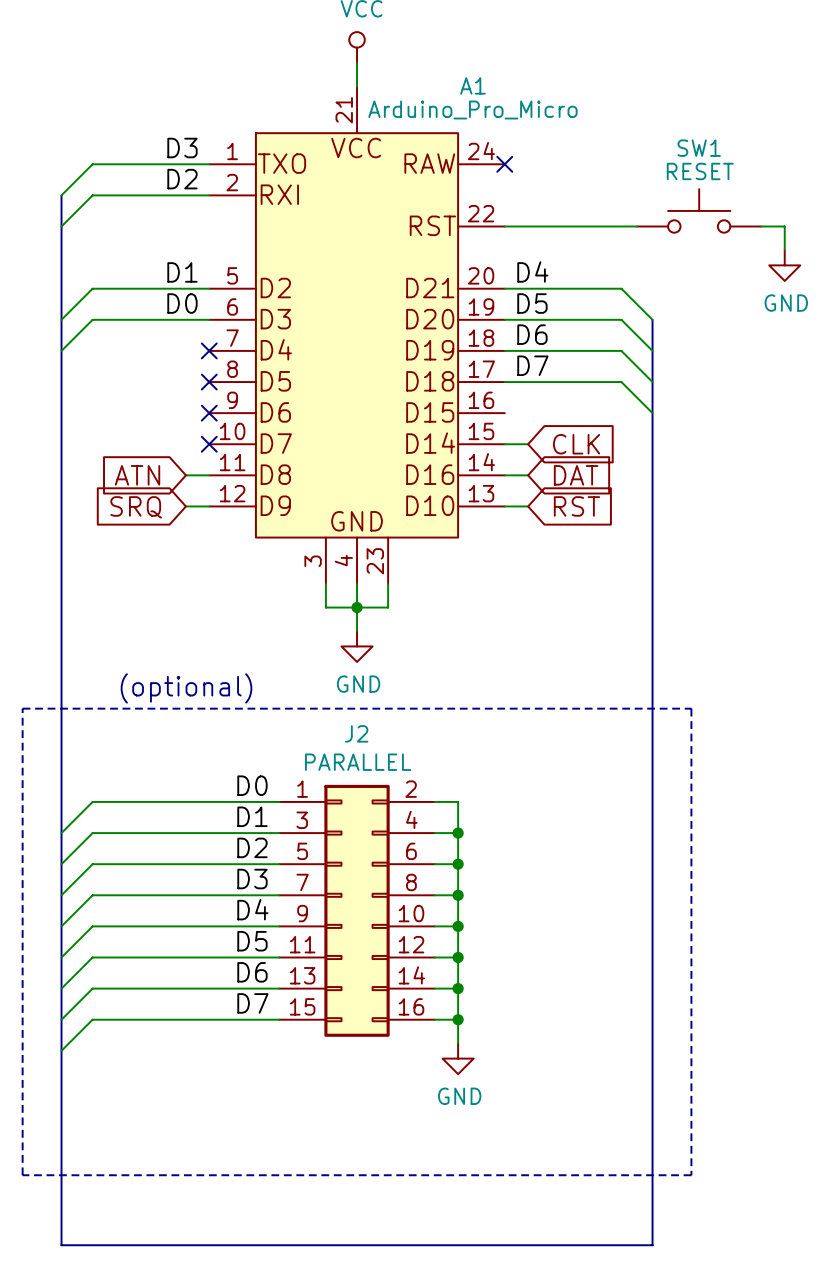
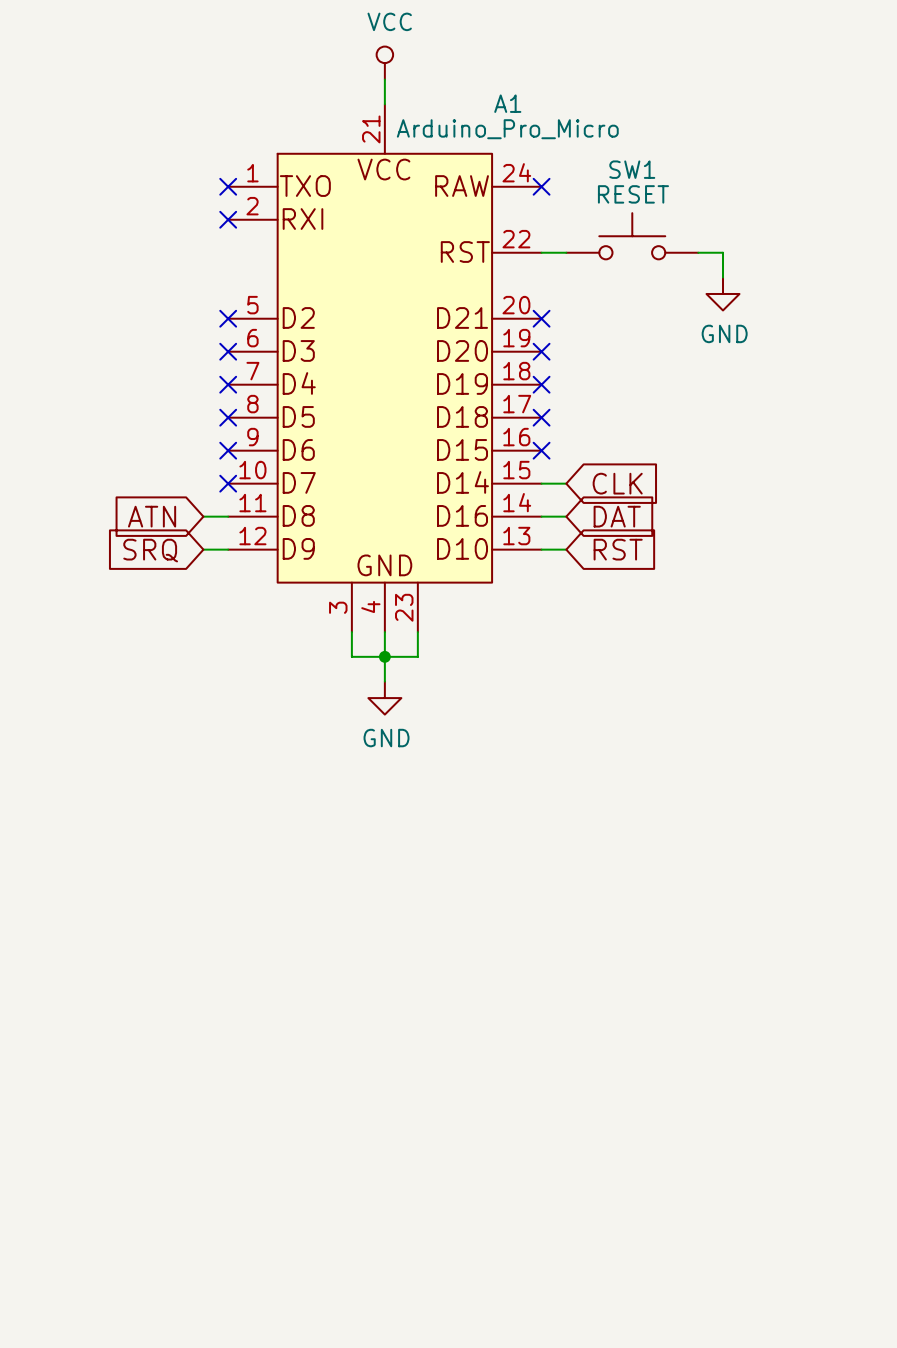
label: D3 (182, 148) -> none
wire: (209, 164) (92, 164) (61, 195) -> none
no-connect mark: none -> (228, 186)
label: D2 (182, 179) -> none
bus: (61, 195) (61, 1245) (652, 1245) (652, 319) -> none
wire: (209, 195) (92, 195) (61, 226) -> none
no-connect mark: none -> (228, 219)
SW1 position: (699, 210) -> (632, 236)
wire: (528, 226) (636, 226) -> none
wire: (761, 226) (784, 226) (784, 249) -> (698, 252) (723, 252) (723, 277)
power symbol position: GND (784, 265) -> GND (723, 293)
label: D4 (532, 271) -> none
label: D1 (182, 272) -> none
wire: (209, 288) (92, 288) (61, 319) -> none
no-connect mark: none -> (228, 318)
wire: (504, 288) (621, 288) (652, 319) -> none
no-connect mark: none -> (541, 318)
label: D0 (182, 303) -> none
label: D5 (532, 303) -> none
wire: (209, 319) (92, 319) (61, 350) -> none
no-connect mark: none -> (228, 351)
wire: (504, 319) (621, 319) (652, 350) -> none
no-connect mark: none -> (541, 351)
label: D6 (532, 334) -> none
wire: (504, 350) (621, 350) (652, 382) -> none
no-connect mark: none -> (541, 384)
label: D7 (532, 365) -> none
wire: (504, 382) (621, 382) (652, 413) -> none
no-connect mark: none -> (541, 417)
no-connect mark: none -> (541, 450)
text: (optional) (186, 688) -> none
line: (22, 708) (691, 708) (691, 1175) (22, 1175) (22, 708) -> none
label: D0 (252, 785) -> none
wire: (279, 801) (92, 801) (61, 833) -> none
wire: (434, 801) (458, 801) (458, 1043) -> none
label: D1 (252, 816) -> none
wire: (279, 833) (92, 833) (61, 864) -> none
wire: (434, 833) (458, 833) -> none
junction: (458, 833) -> none
label: D2 (252, 847) -> none
wire: (279, 864) (92, 864) (61, 895) -> none
wire: (434, 864) (458, 864) -> none
junction: (458, 864) -> none
label: D3 (252, 879) -> none
wire: (279, 895) (92, 895) (61, 926) -> none
wire: (434, 895) (458, 895) -> none
junction: (458, 895) -> none
label: D4 (252, 909) -> none
J2: PARALLEL (357, 910) -> none
wire: (279, 926) (92, 926) (61, 957) -> none
wire: (434, 926) (458, 926) -> none
junction: (458, 926) -> none
label: D5 (252, 941) -> none
wire: (279, 957) (92, 957) (61, 988) -> none
wire: (434, 957) (458, 957) -> none
junction: (458, 957) -> none
label: D6 (252, 972) -> none
wire: (279, 988) (92, 988) (61, 1019) -> none
wire: (434, 988) (458, 988) -> none
junction: (458, 988) -> none
label: D7 (252, 1003) -> none
wire: (279, 1019) (92, 1019) (61, 1050) -> none
wire: (434, 1019) (458, 1019) -> none
junction: (458, 1019) -> none
power symbol: GND (458, 1058) -> none

